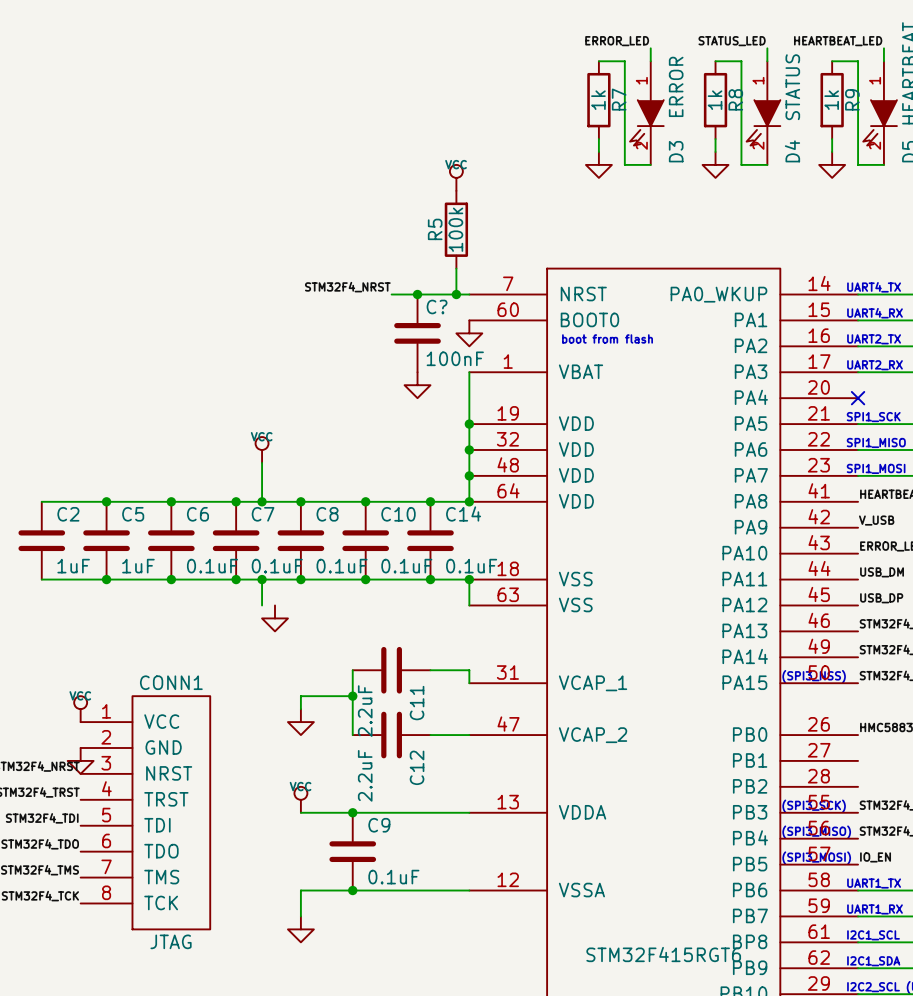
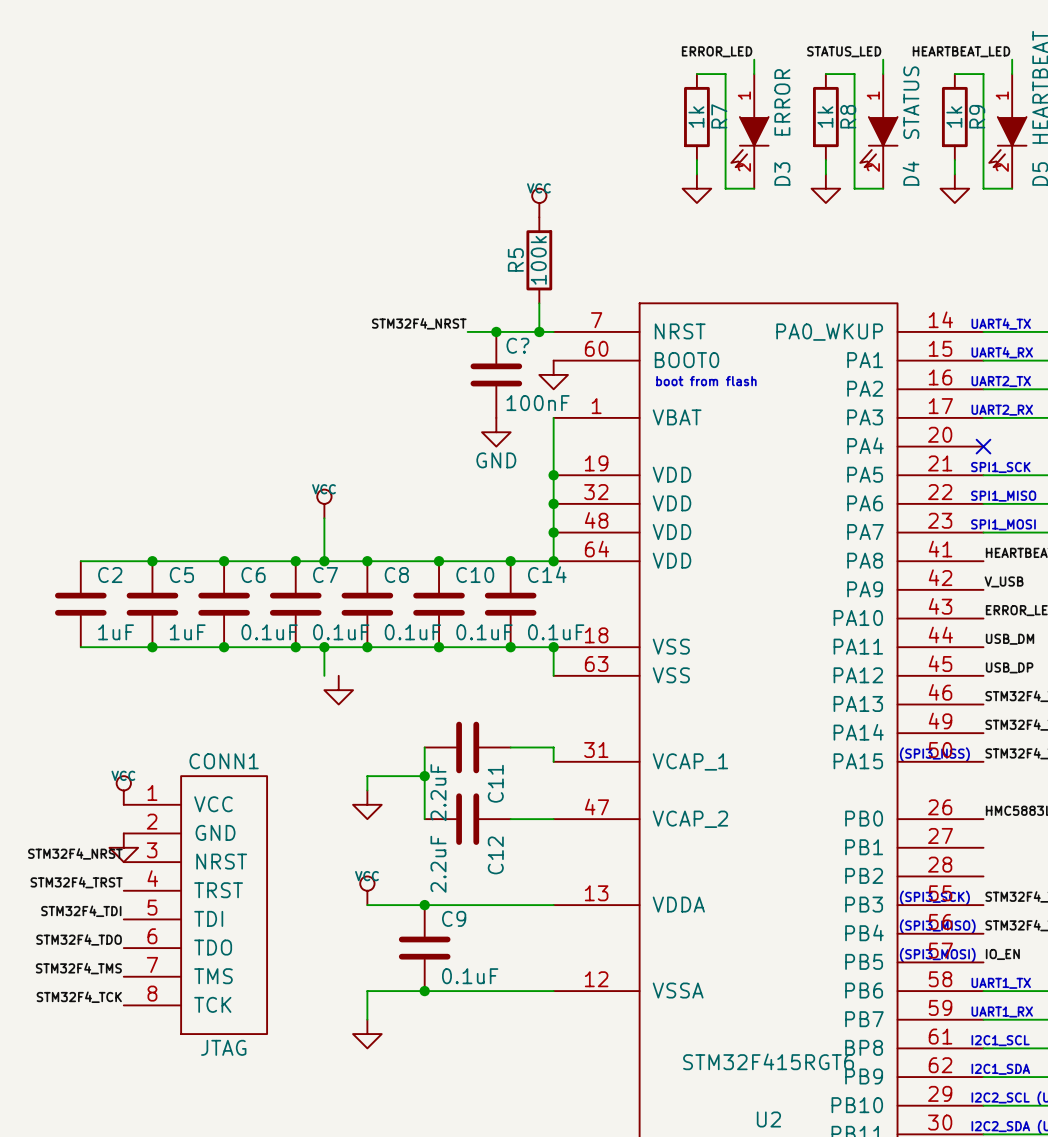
power symbol text: none -> GND (496, 460)

